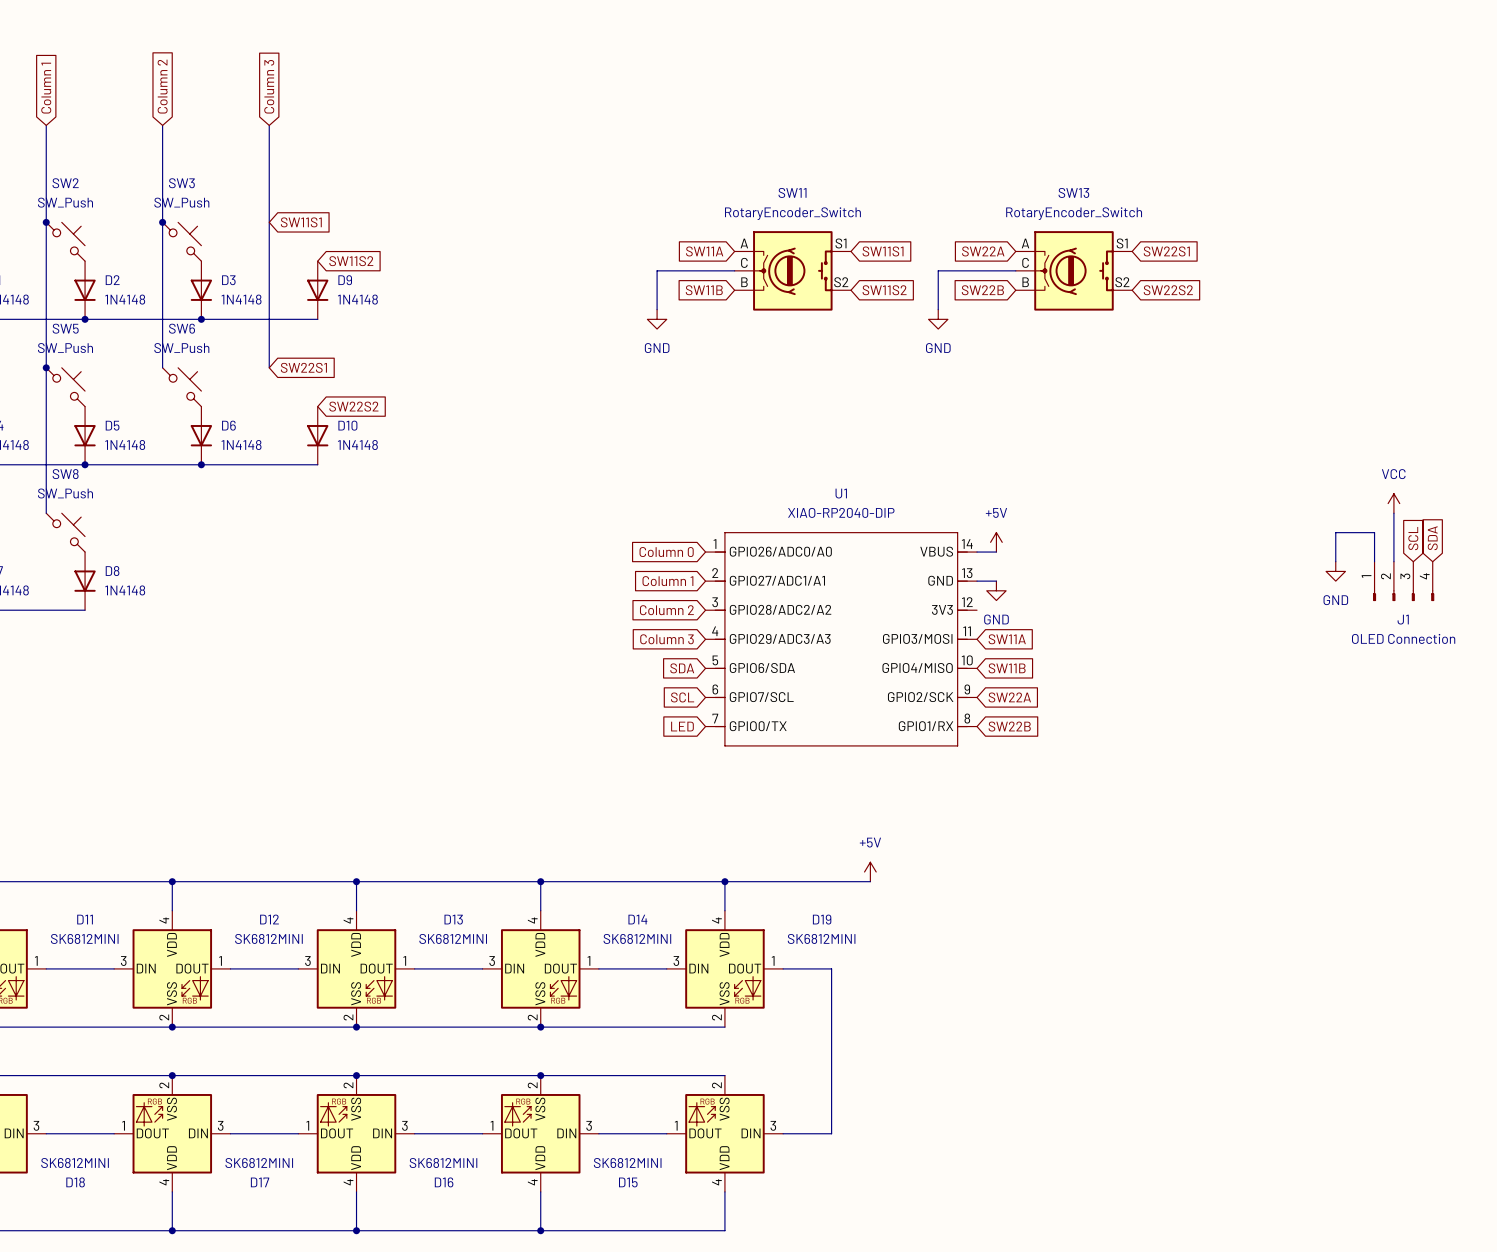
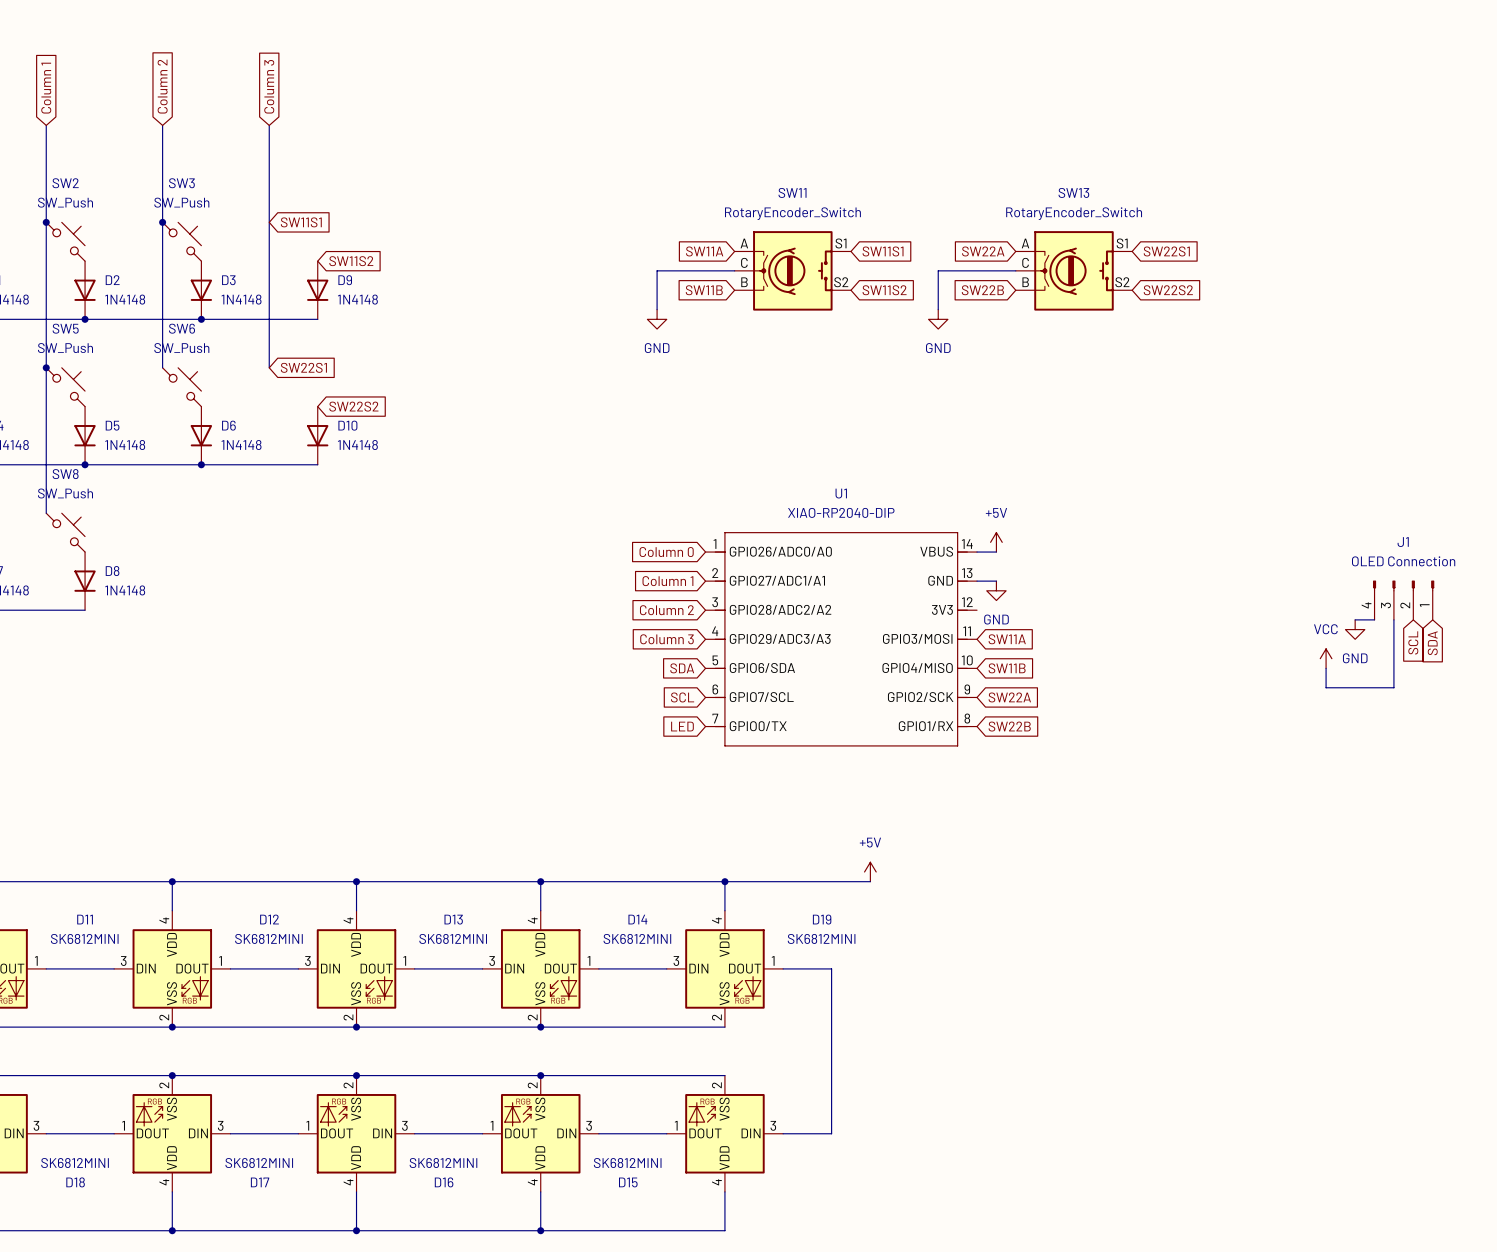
power symbol position: VCC (1393, 503) -> VCC (1326, 658)
wire: (1393, 513) (1393, 561) -> none
global label rotation: 0° (1413, 538) -> 180° (1413, 642)
global label position: SCL (1413, 538) -> SCL (1413, 642)
global label rotation: 0° (1432, 538) -> 180° (1432, 643)
global label position: SDA (1432, 538) -> SDA (1432, 643)
wire: (1335, 561) (1335, 532) (1374, 532) (1374, 561) -> none
power symbol position: GND (1335, 571) -> GND (1355, 629)
J1 rotation: 0° (1403, 595) -> 180° (1403, 585)
wire: none -> (1355, 619) (1374, 619)
wire: none -> (1393, 619) (1393, 687) (1326, 687) (1326, 668)
J1 name position: J1 (1403, 619) -> J1 (1403, 542)
J1 value position: OLED Connection (1403, 638) -> OLED Connection (1403, 561)

